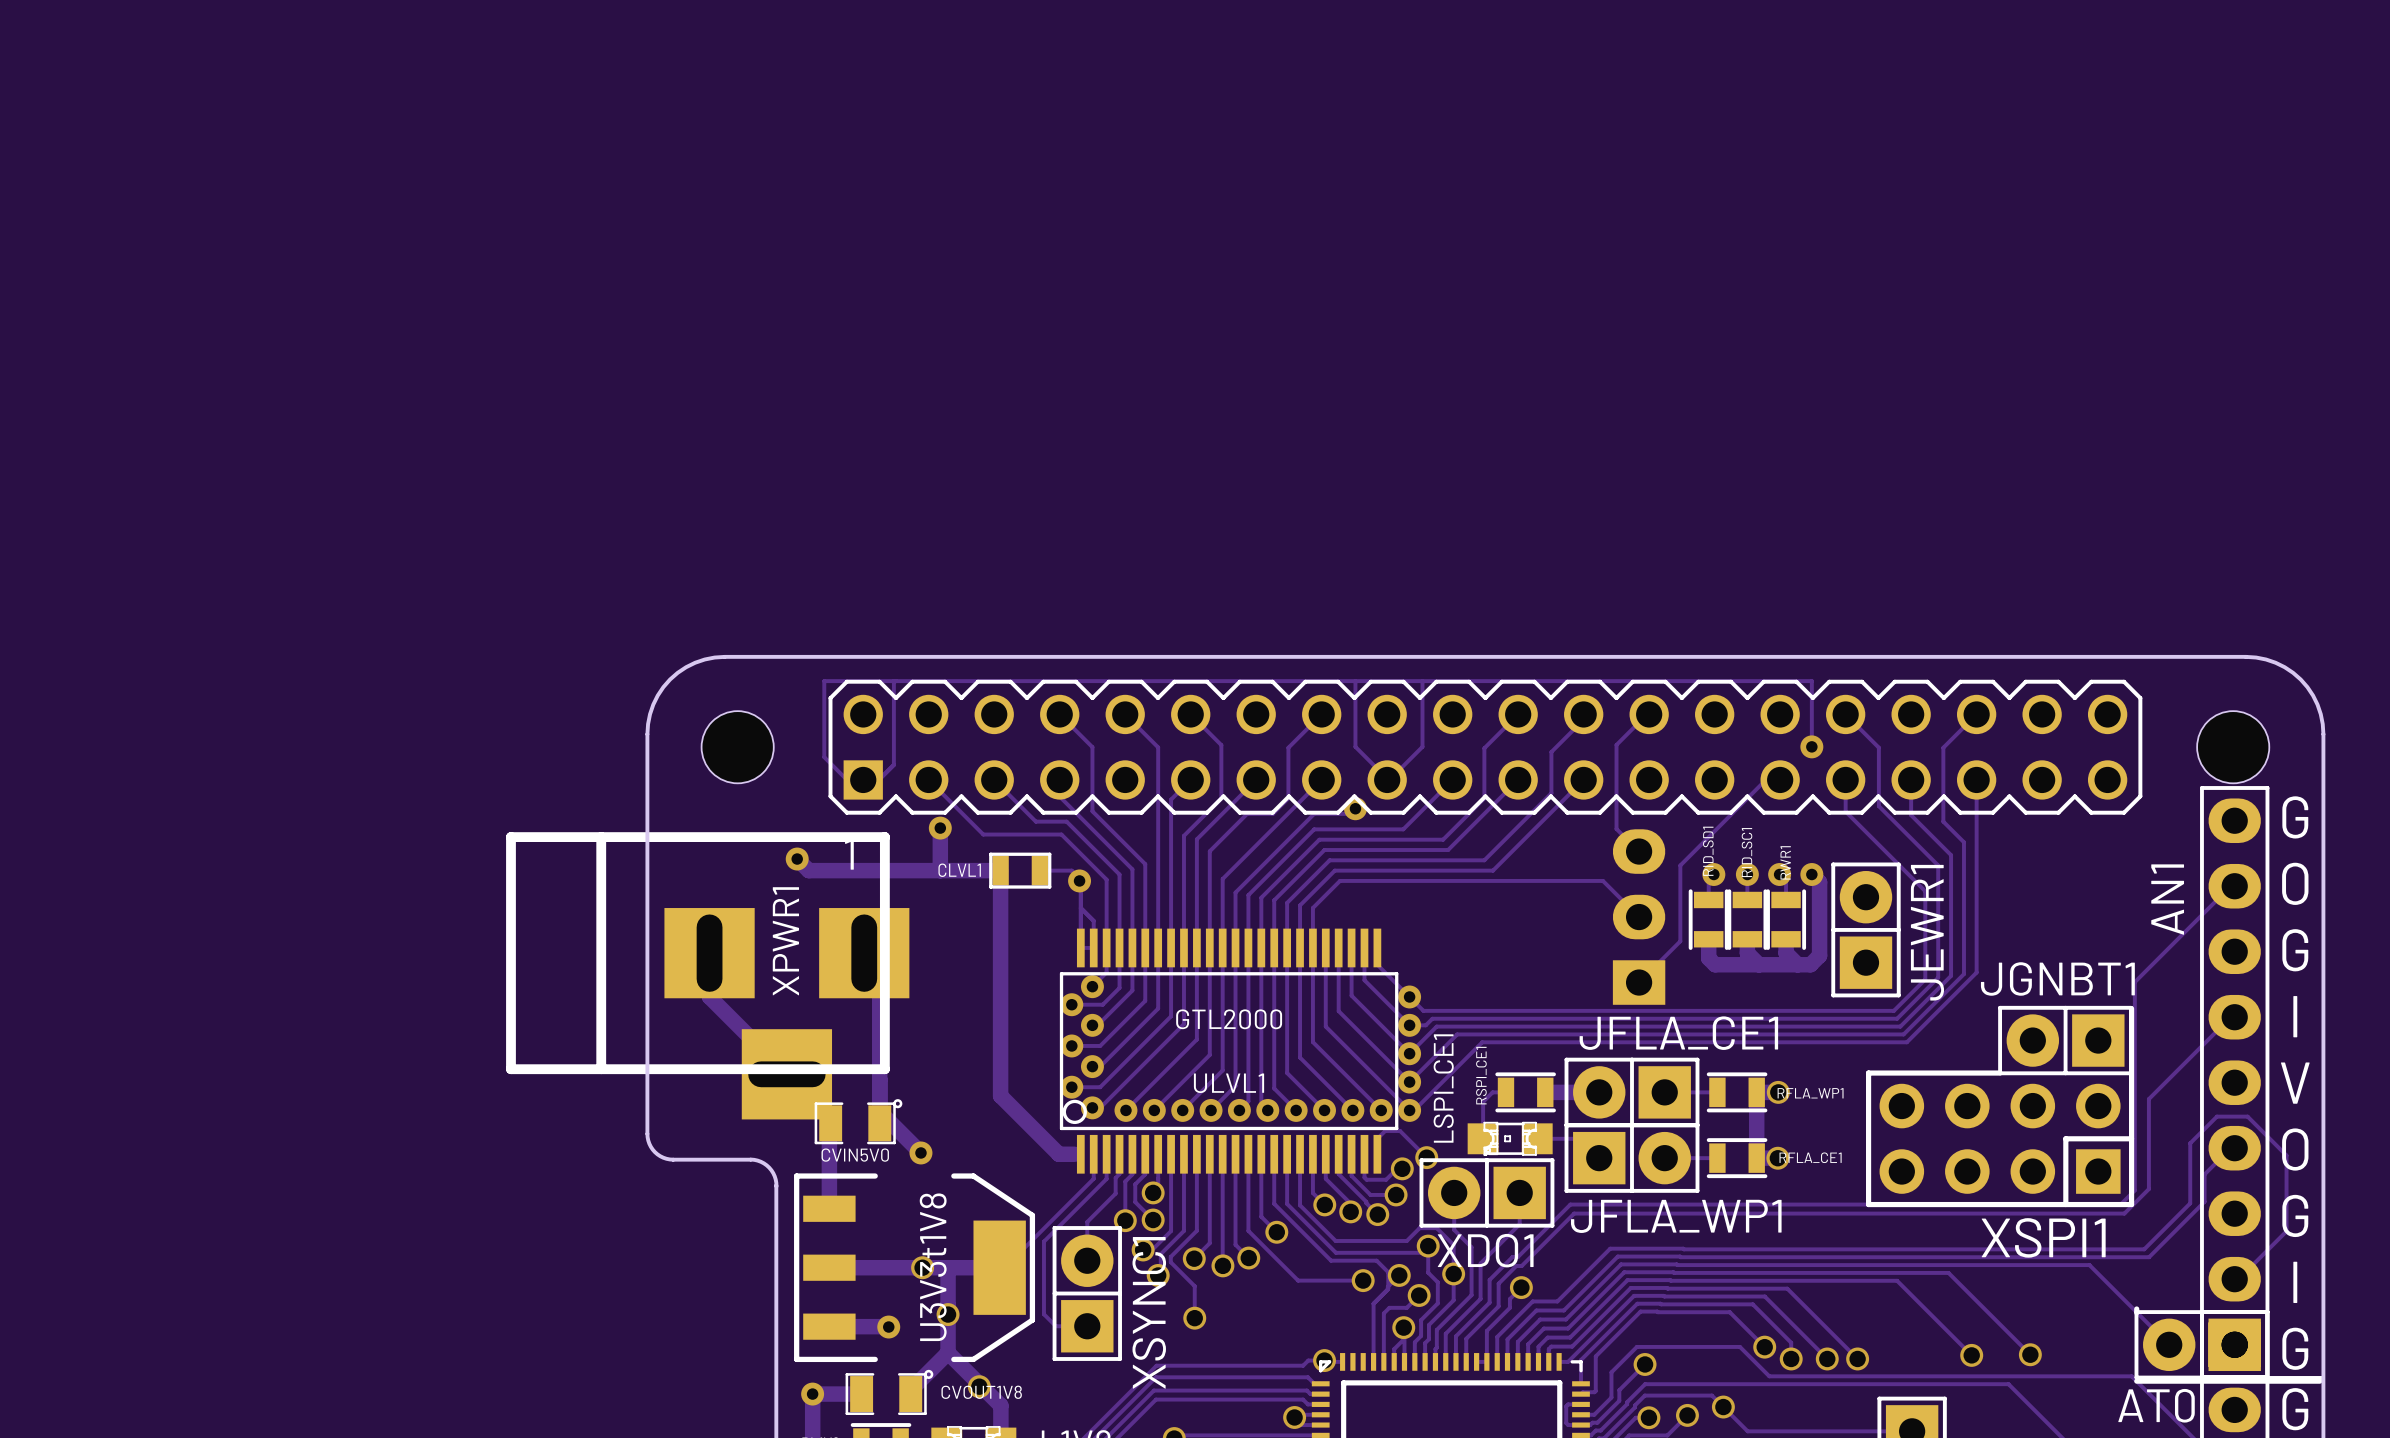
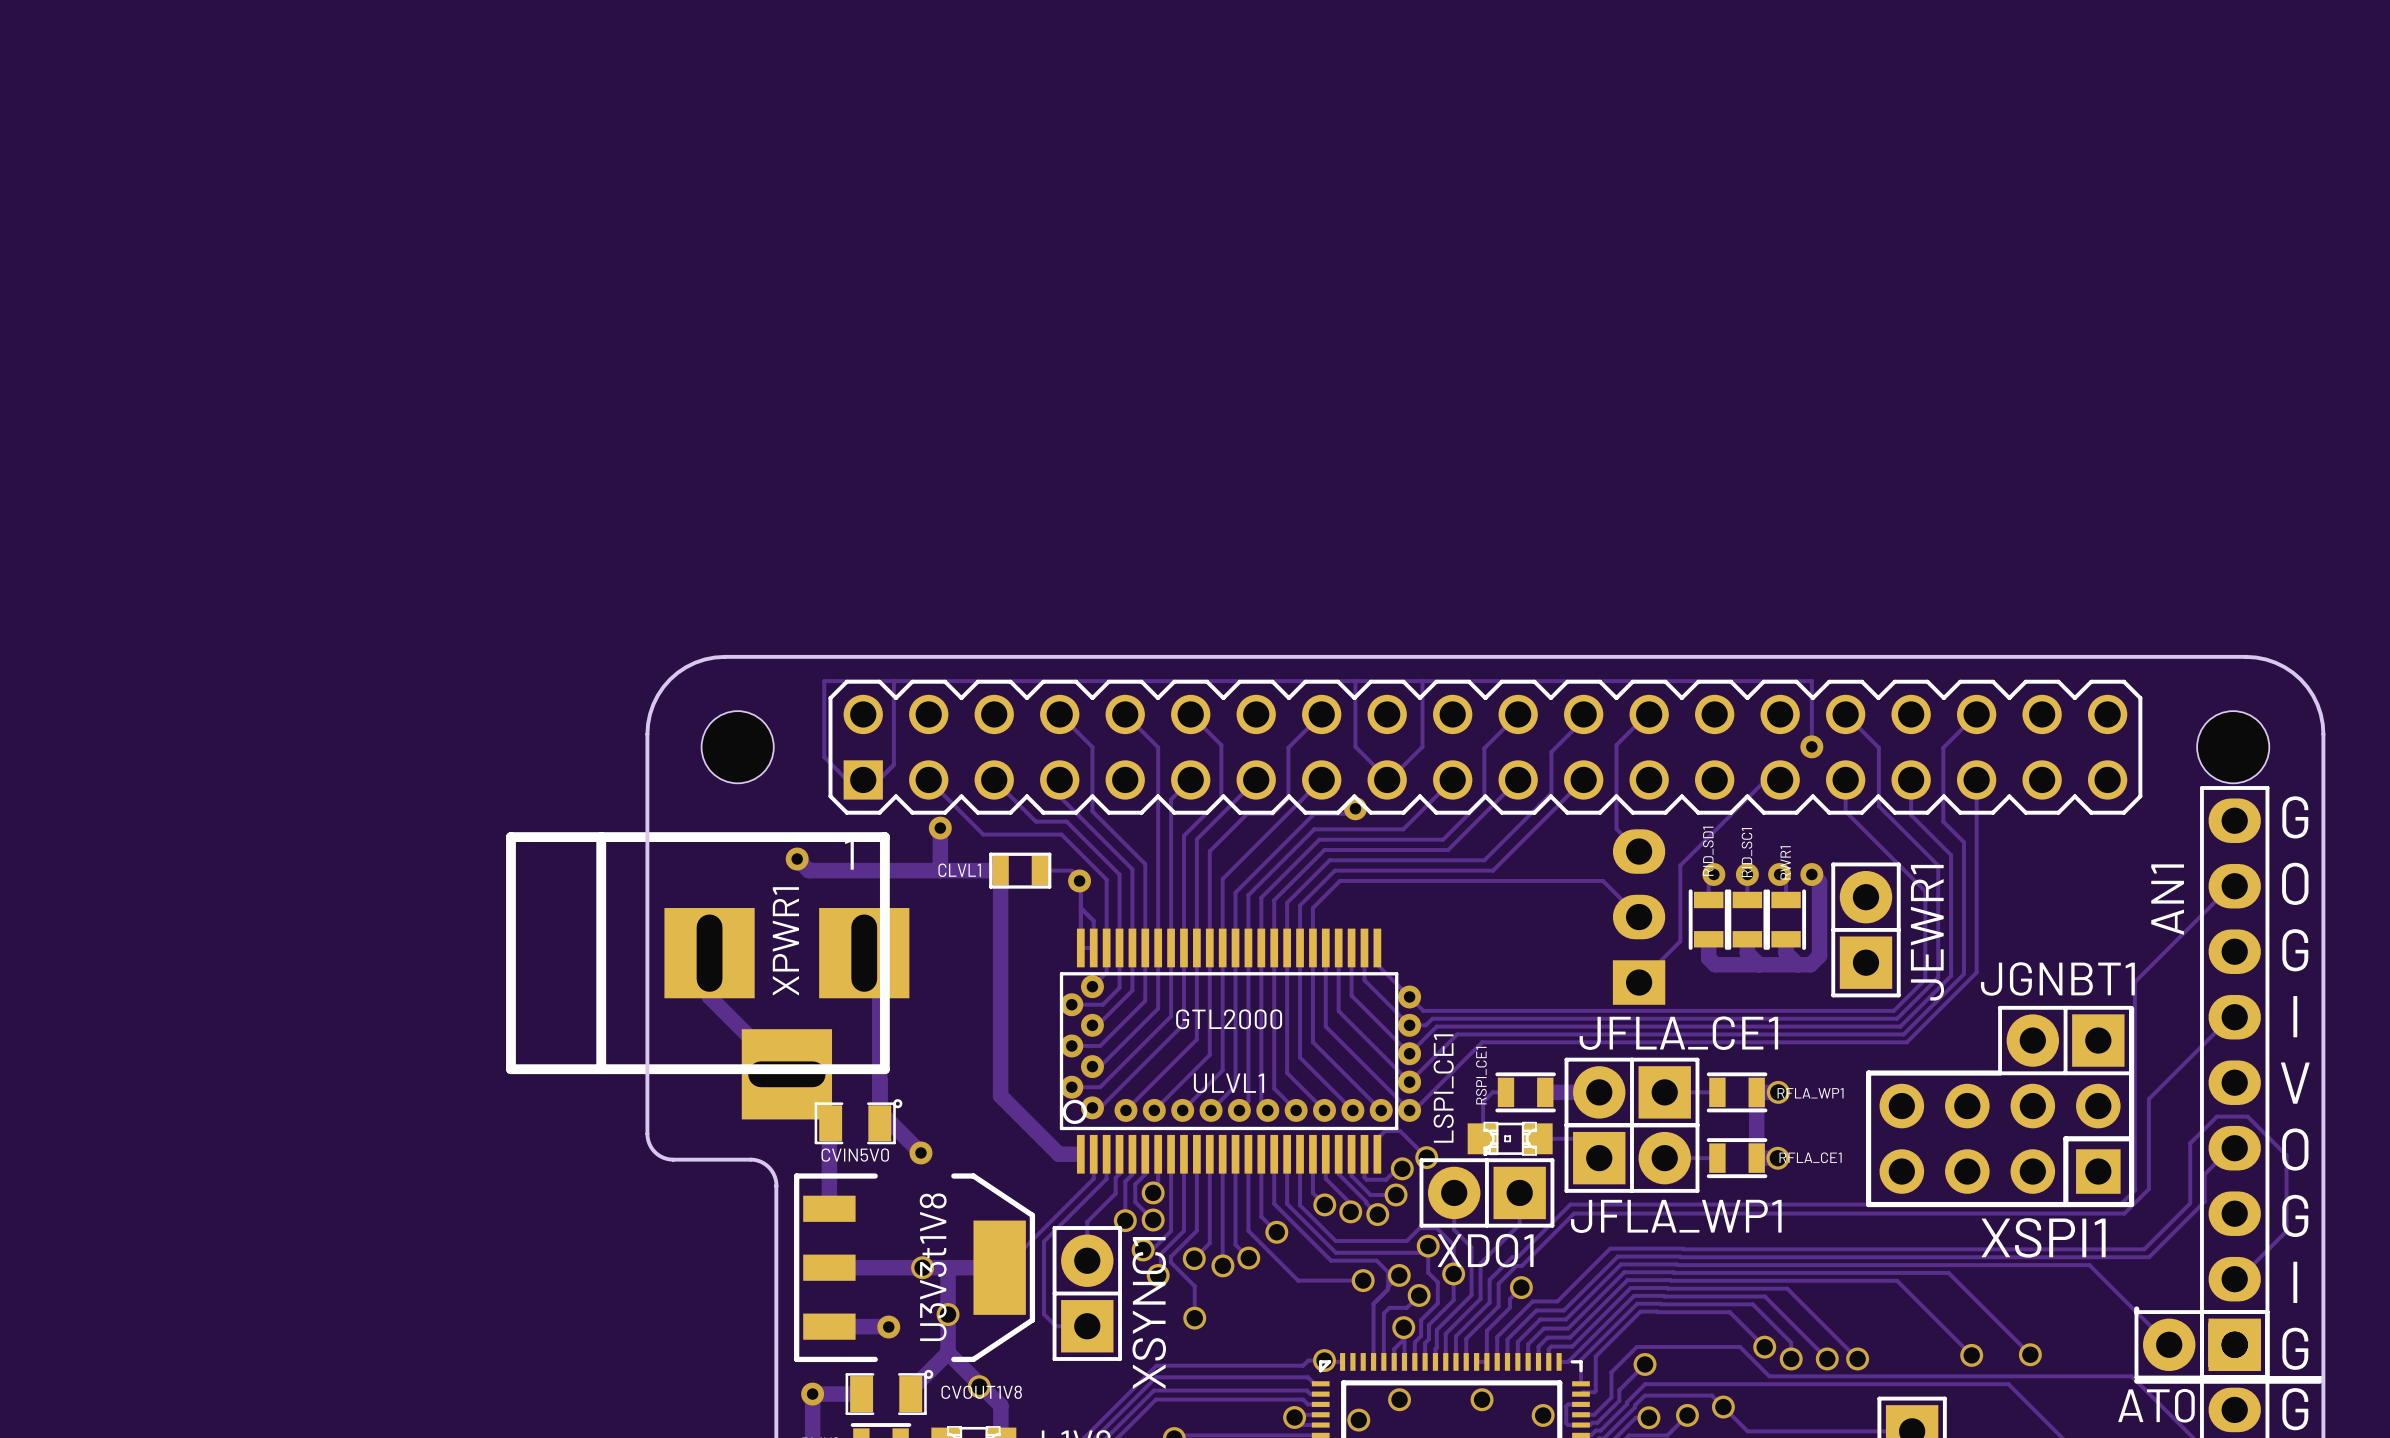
via: none -> (1399, 1399)
via: none -> (1482, 1399)
via: none -> (1543, 1415)
via: none -> (1358, 1420)

